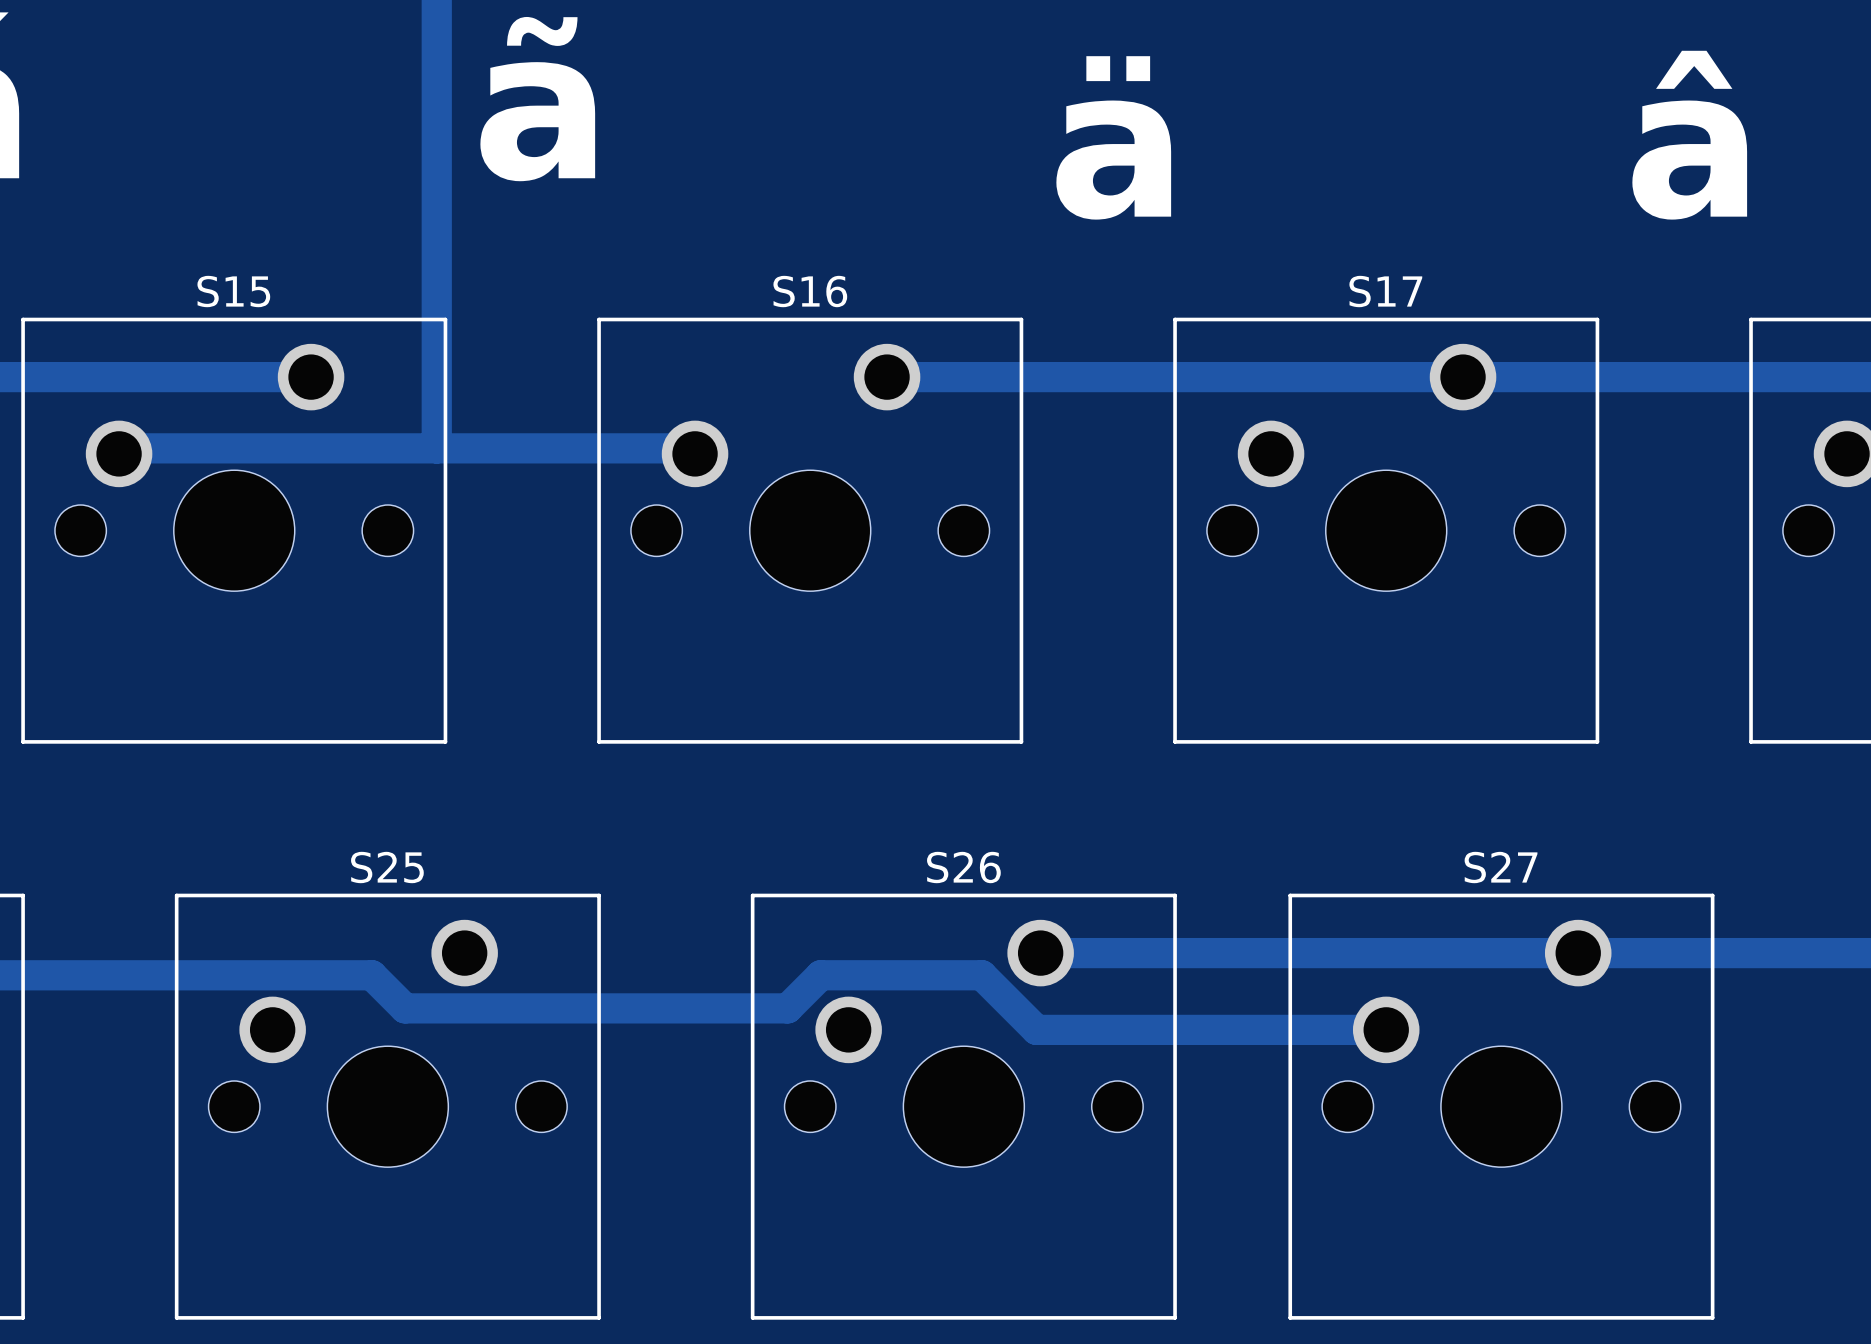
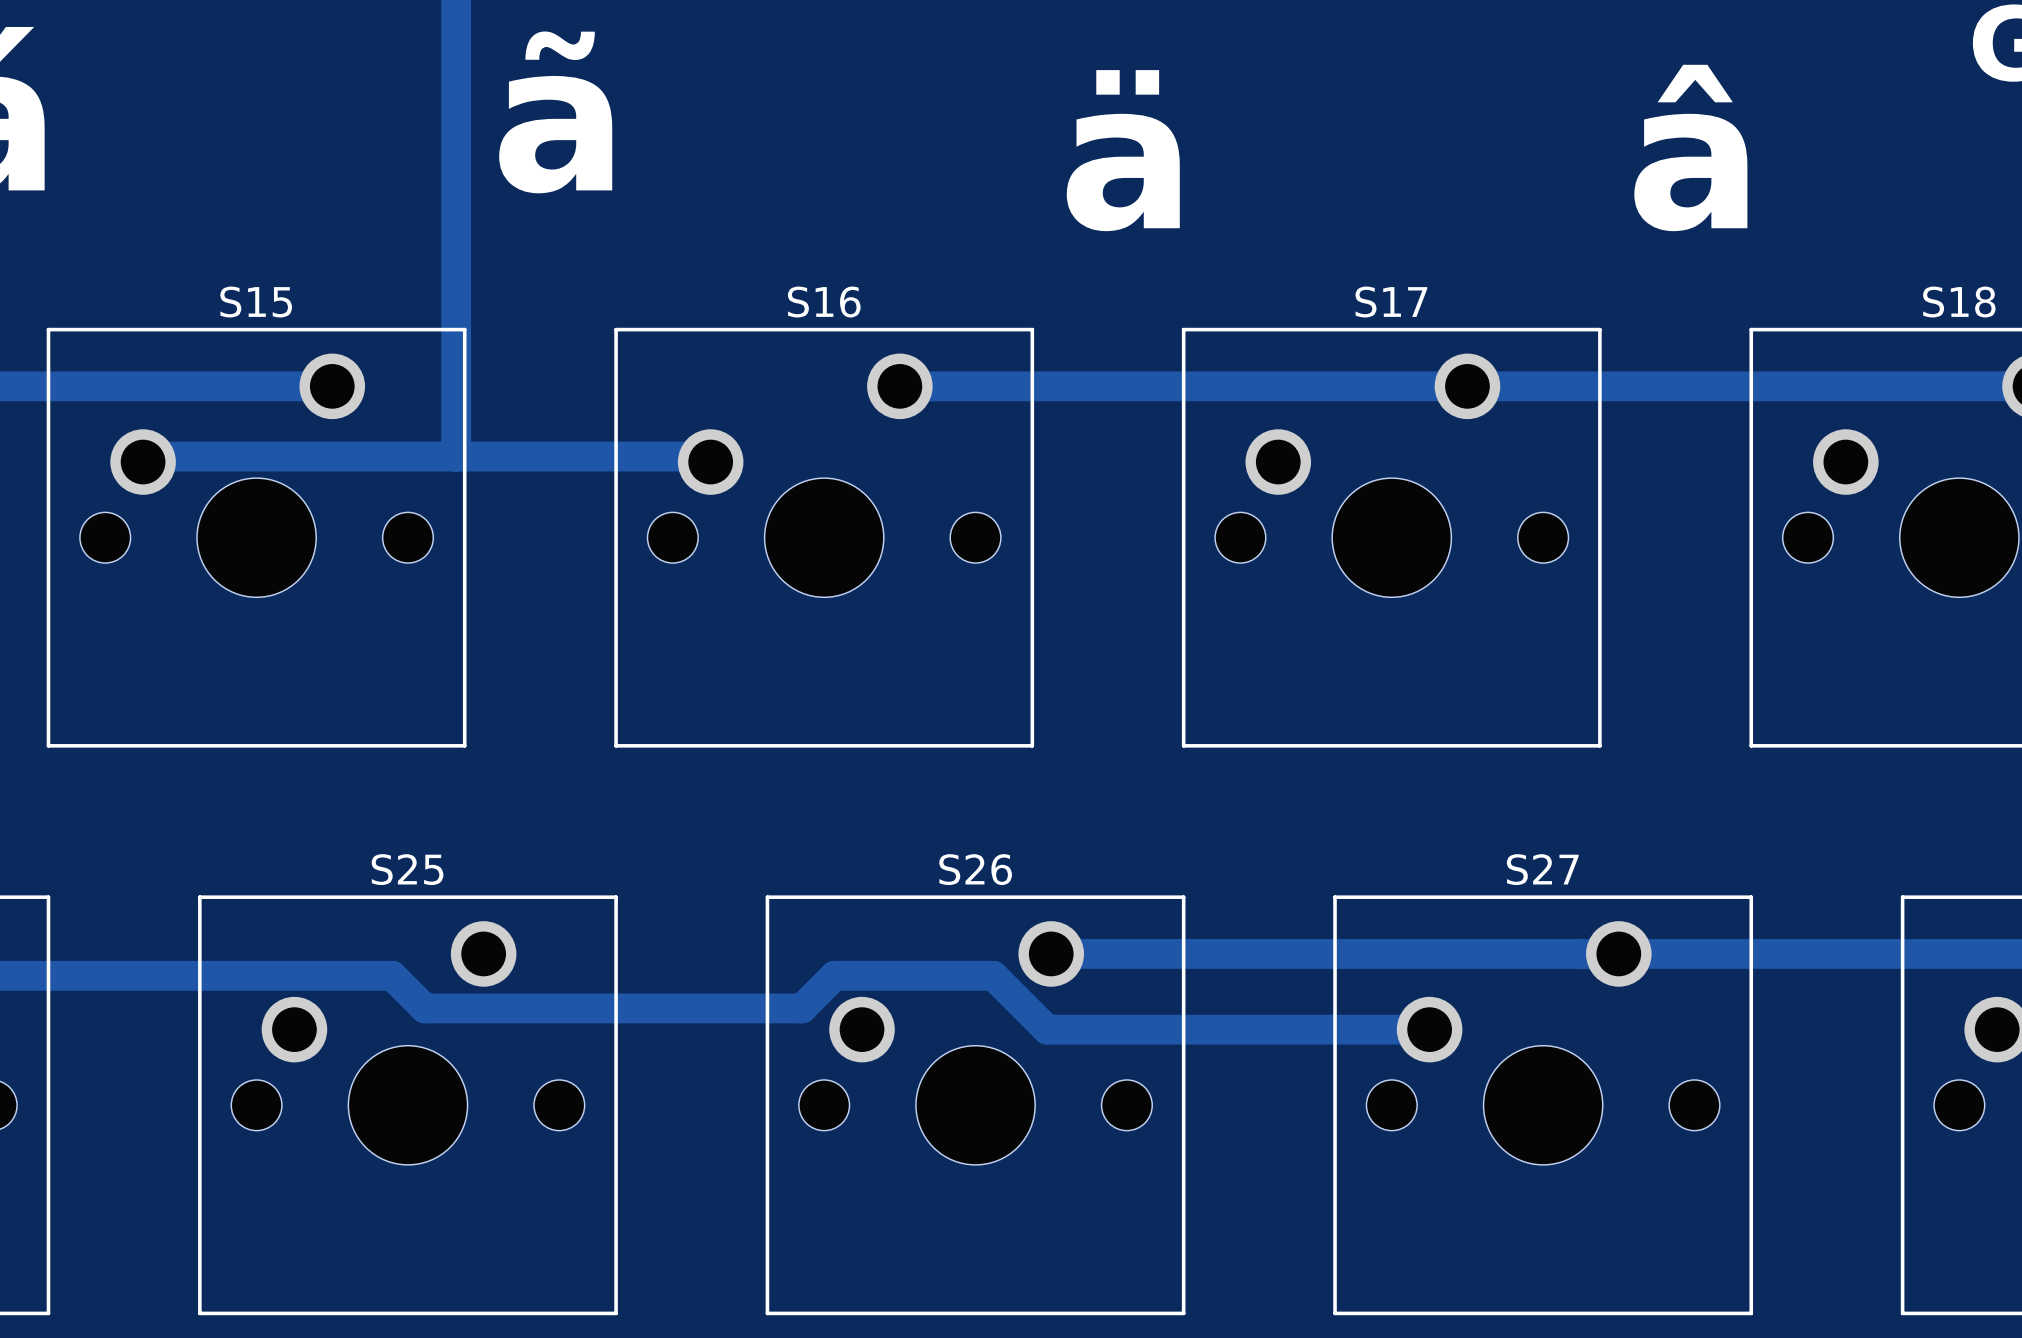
S27 position: (1501, 1106) -> (1543, 1105)

